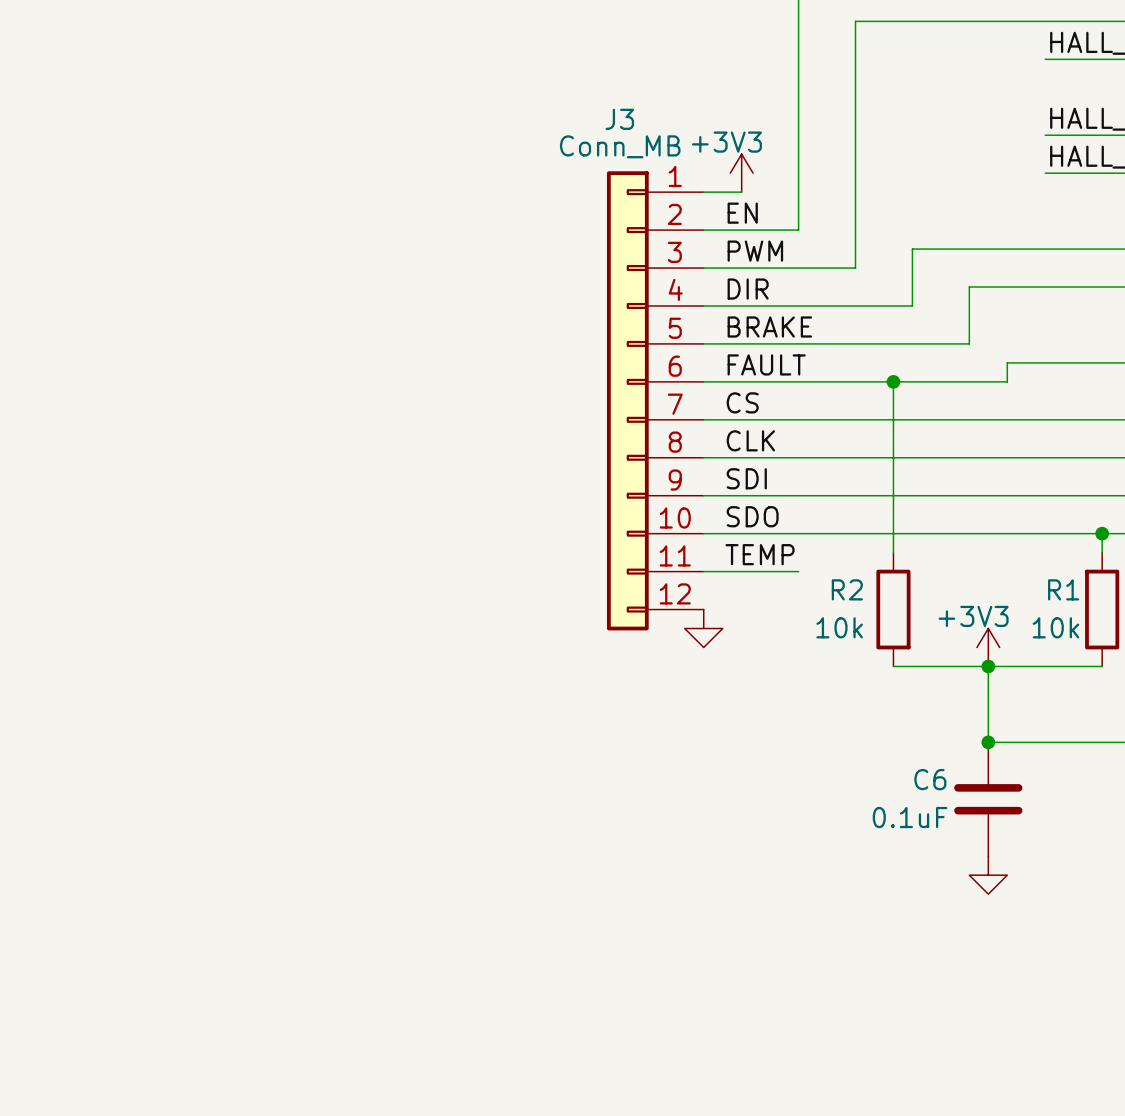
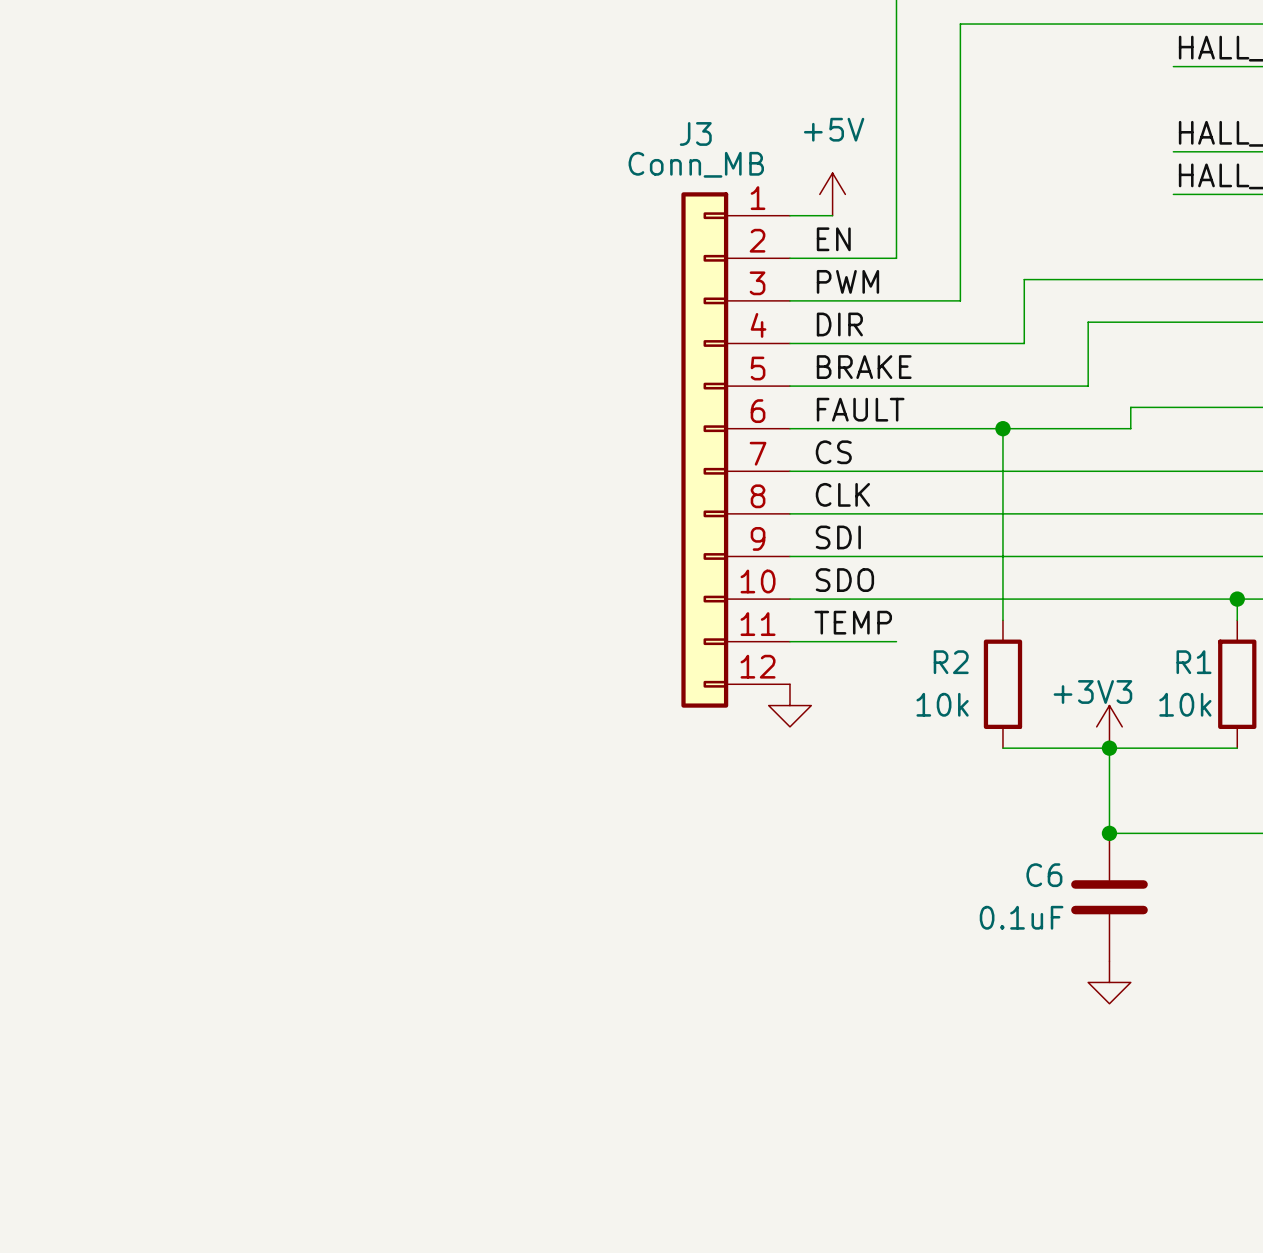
power symbol: +3V3 (741, 173) -> +5V (832, 194)

